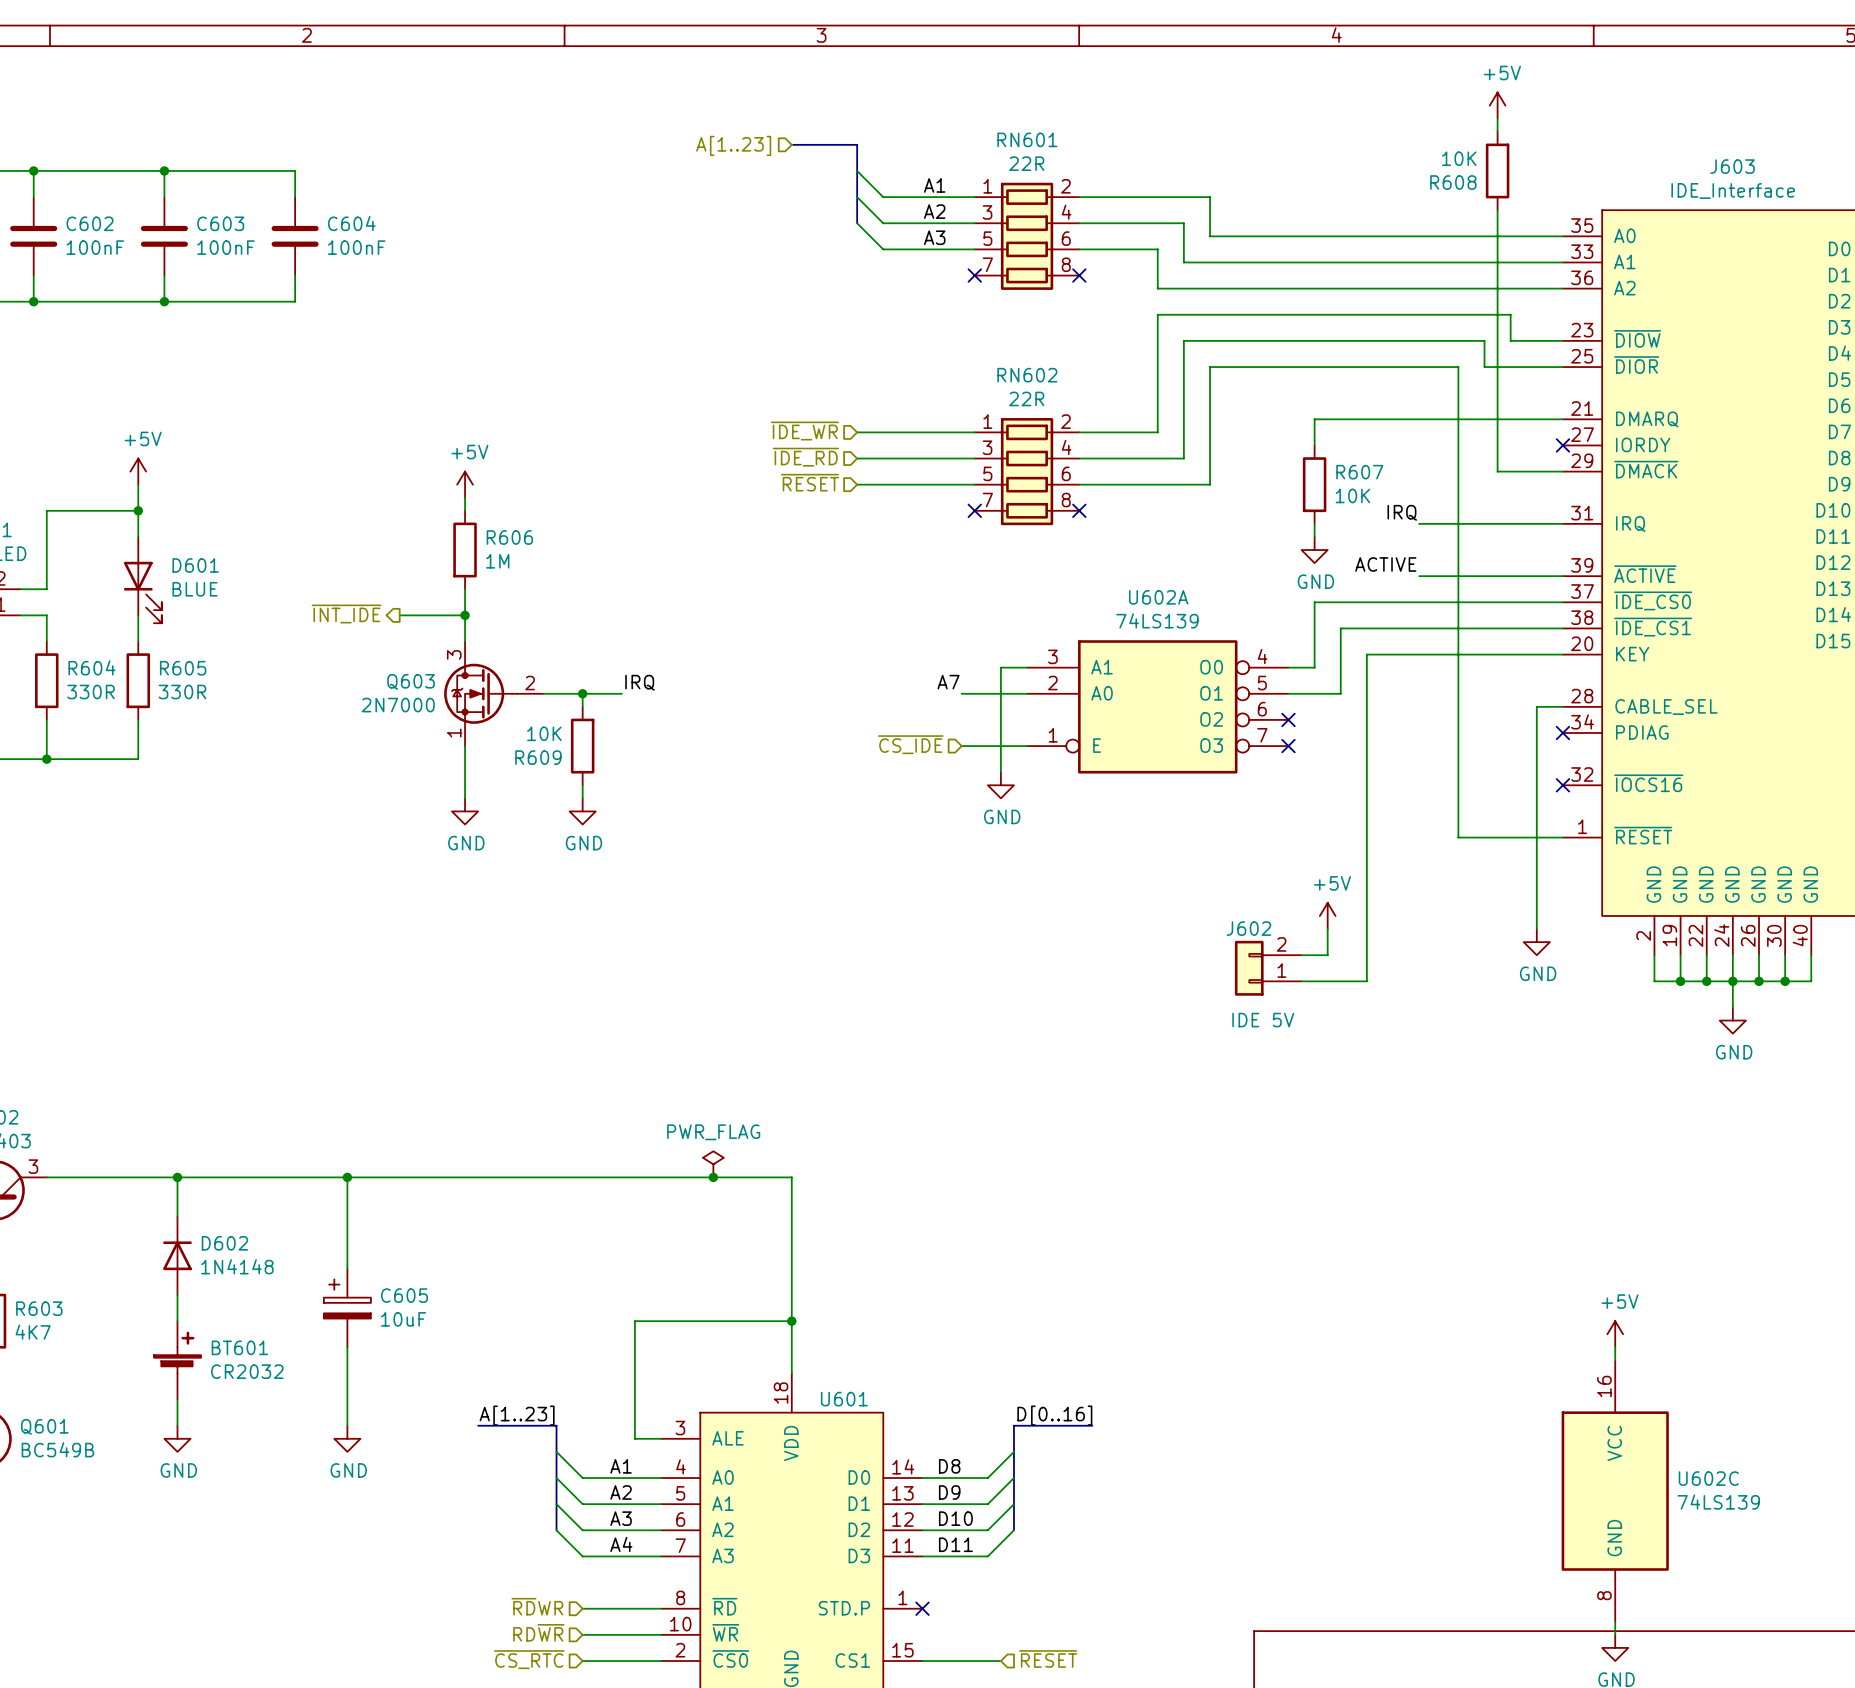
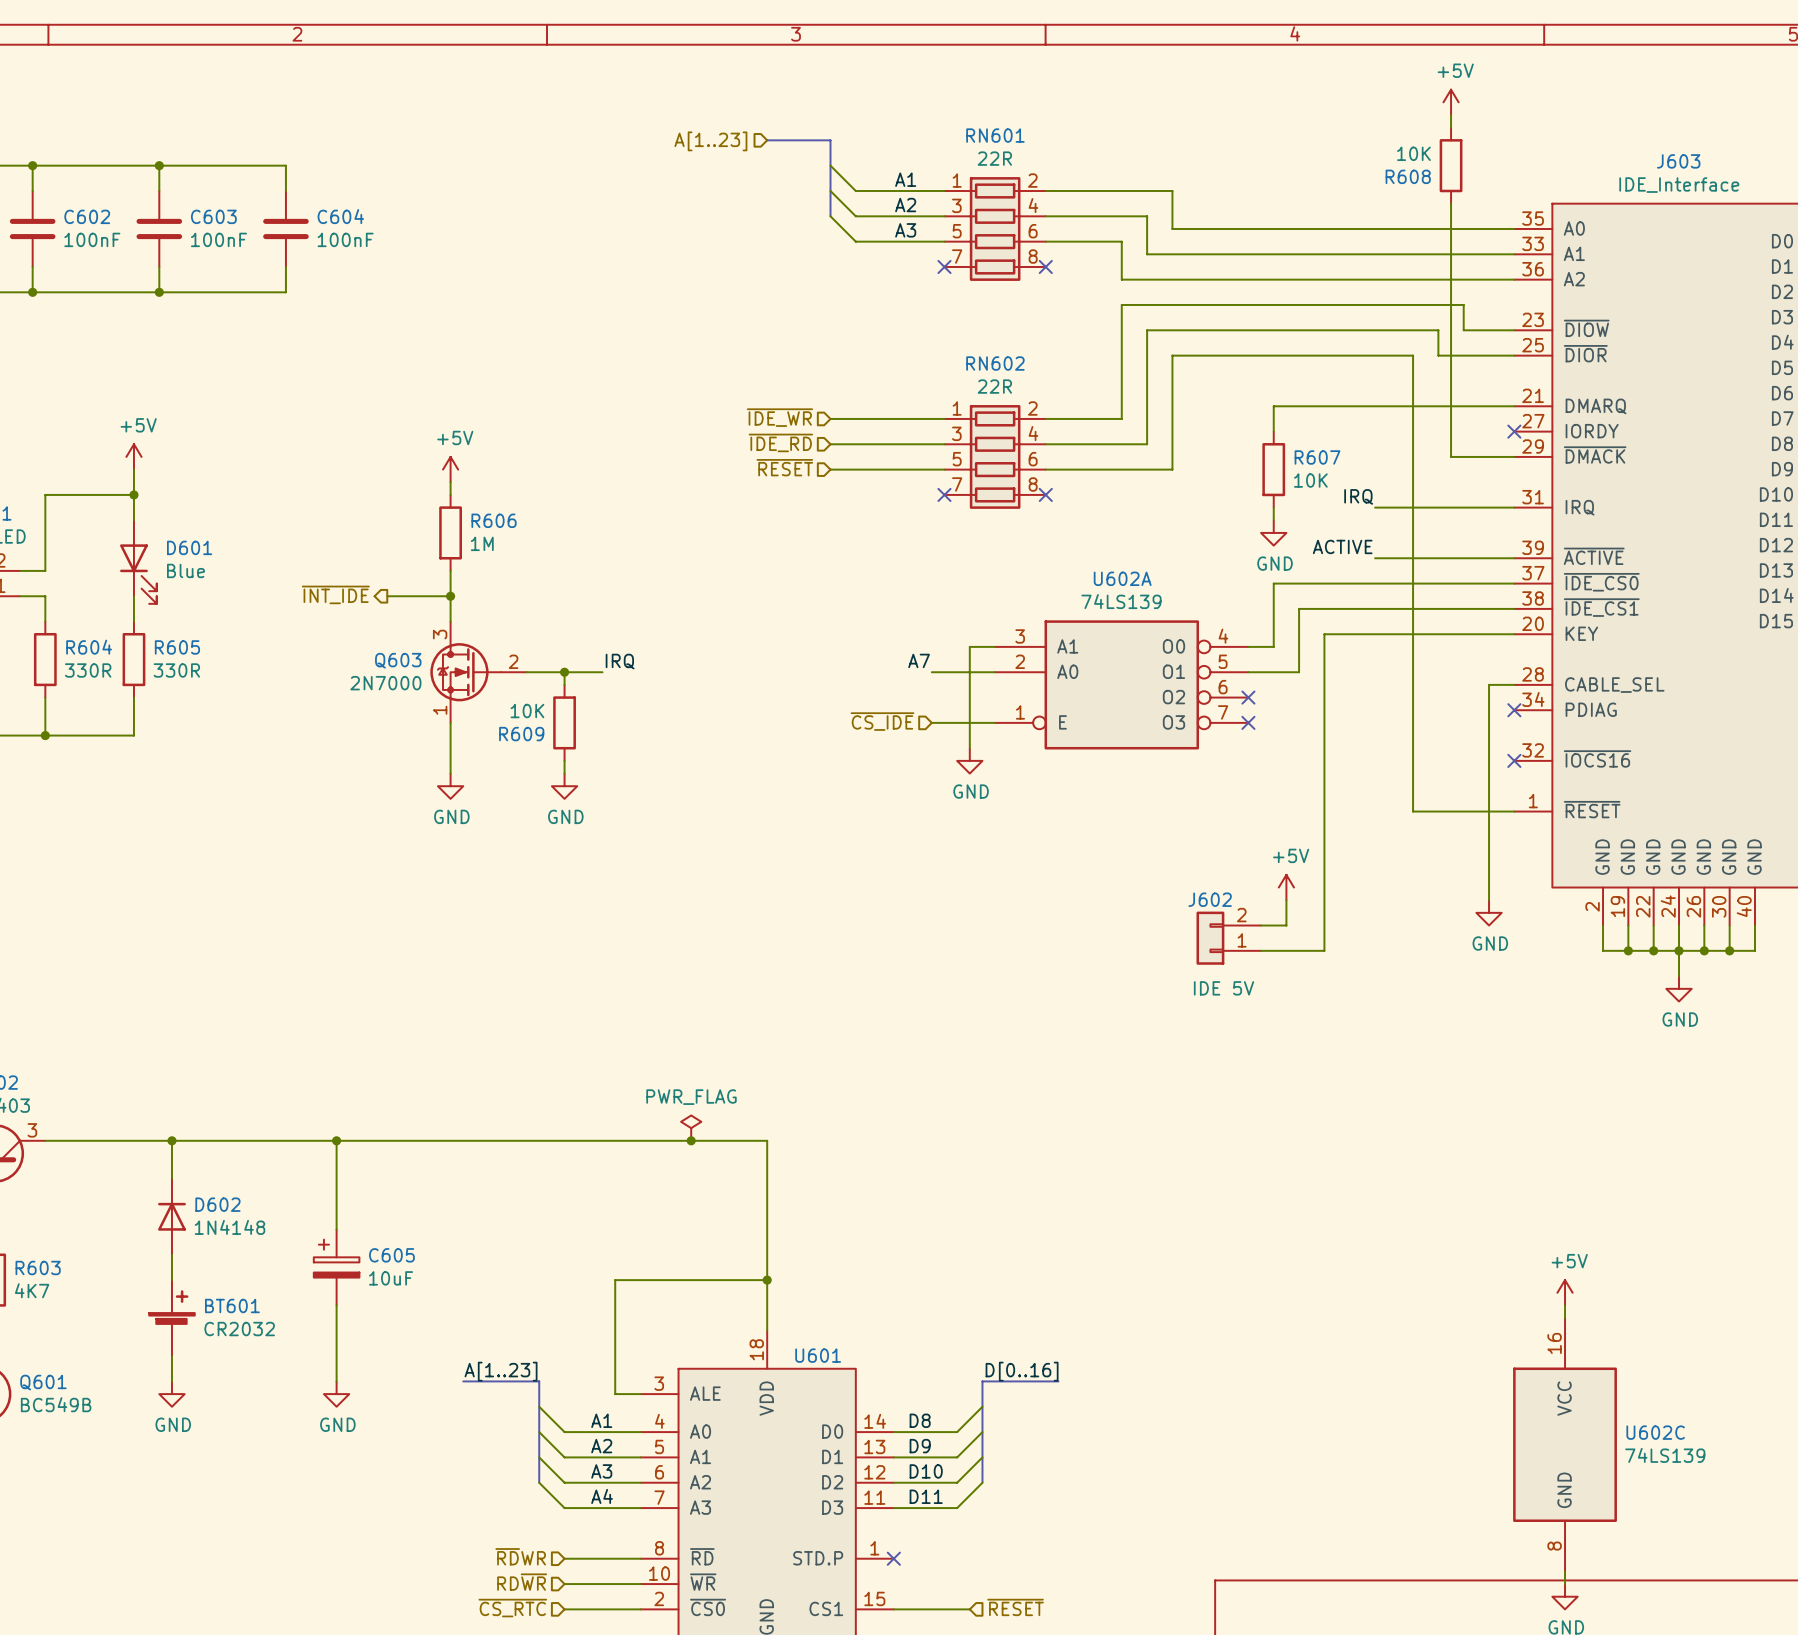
D601 value: BLUE (195, 589) -> Blue (185, 570)

